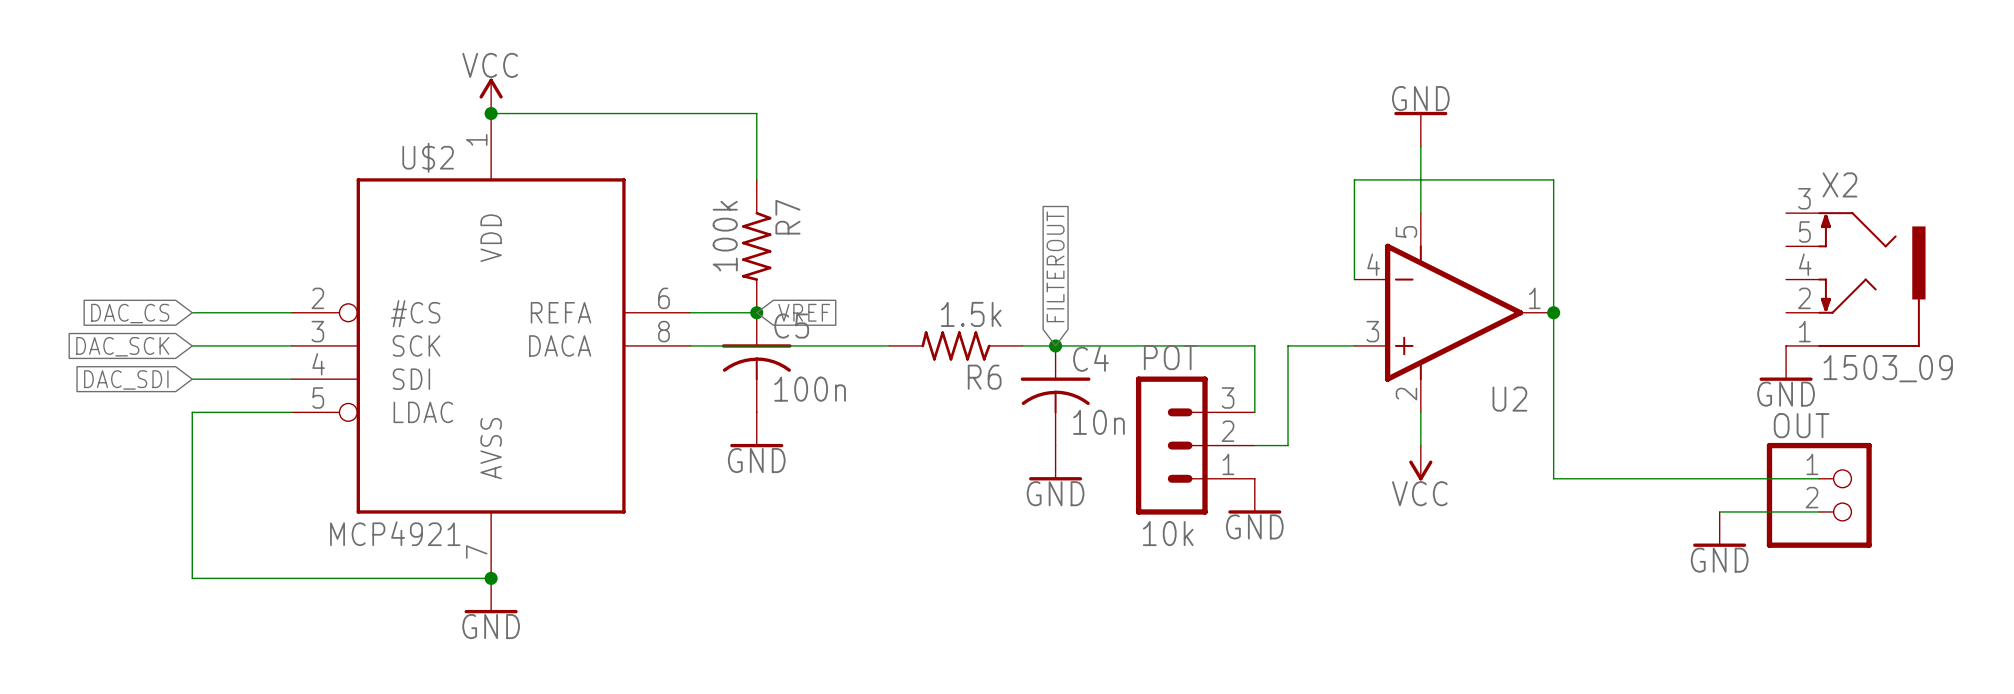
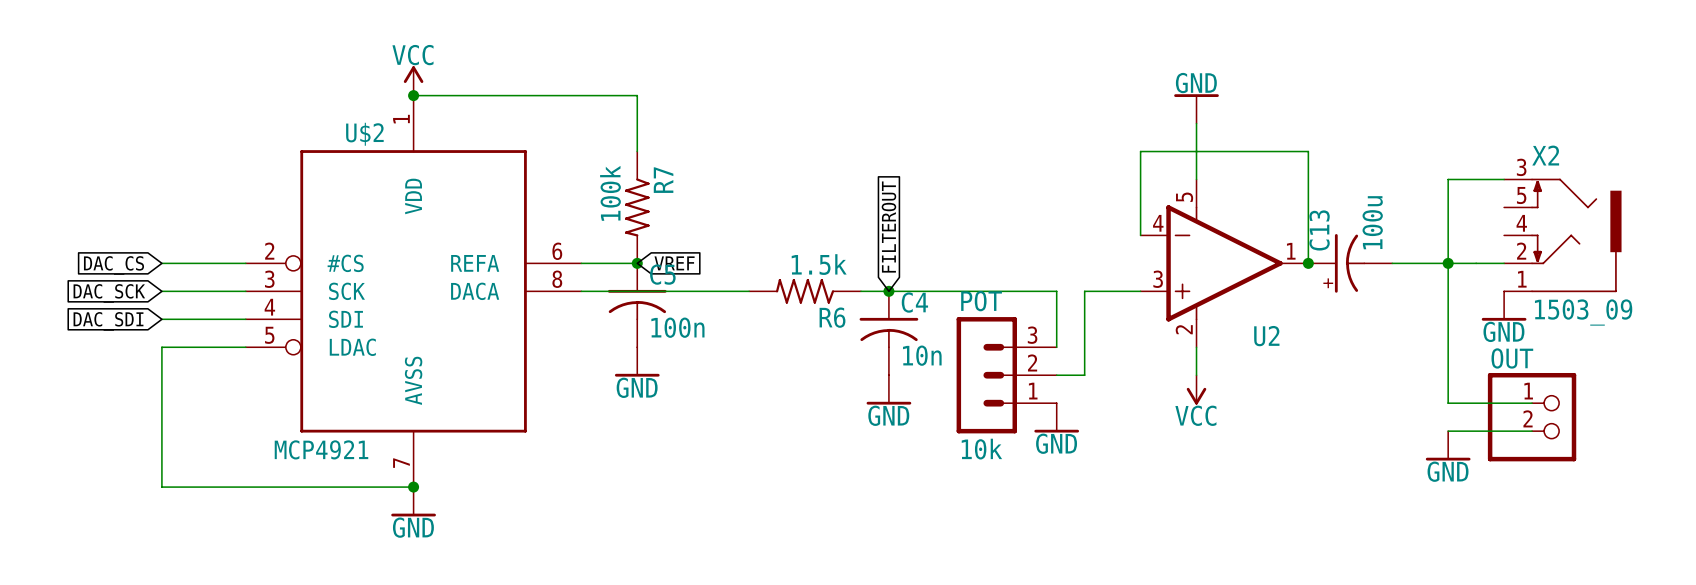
wire: (1553, 312) (1553, 478) (1719, 478) -> (1504, 179) (1448, 179) (1448, 403)
C13: none -> 100u (1350, 263)
wire: none -> (1392, 263) (1504, 263)
junction: none -> (1448, 263)

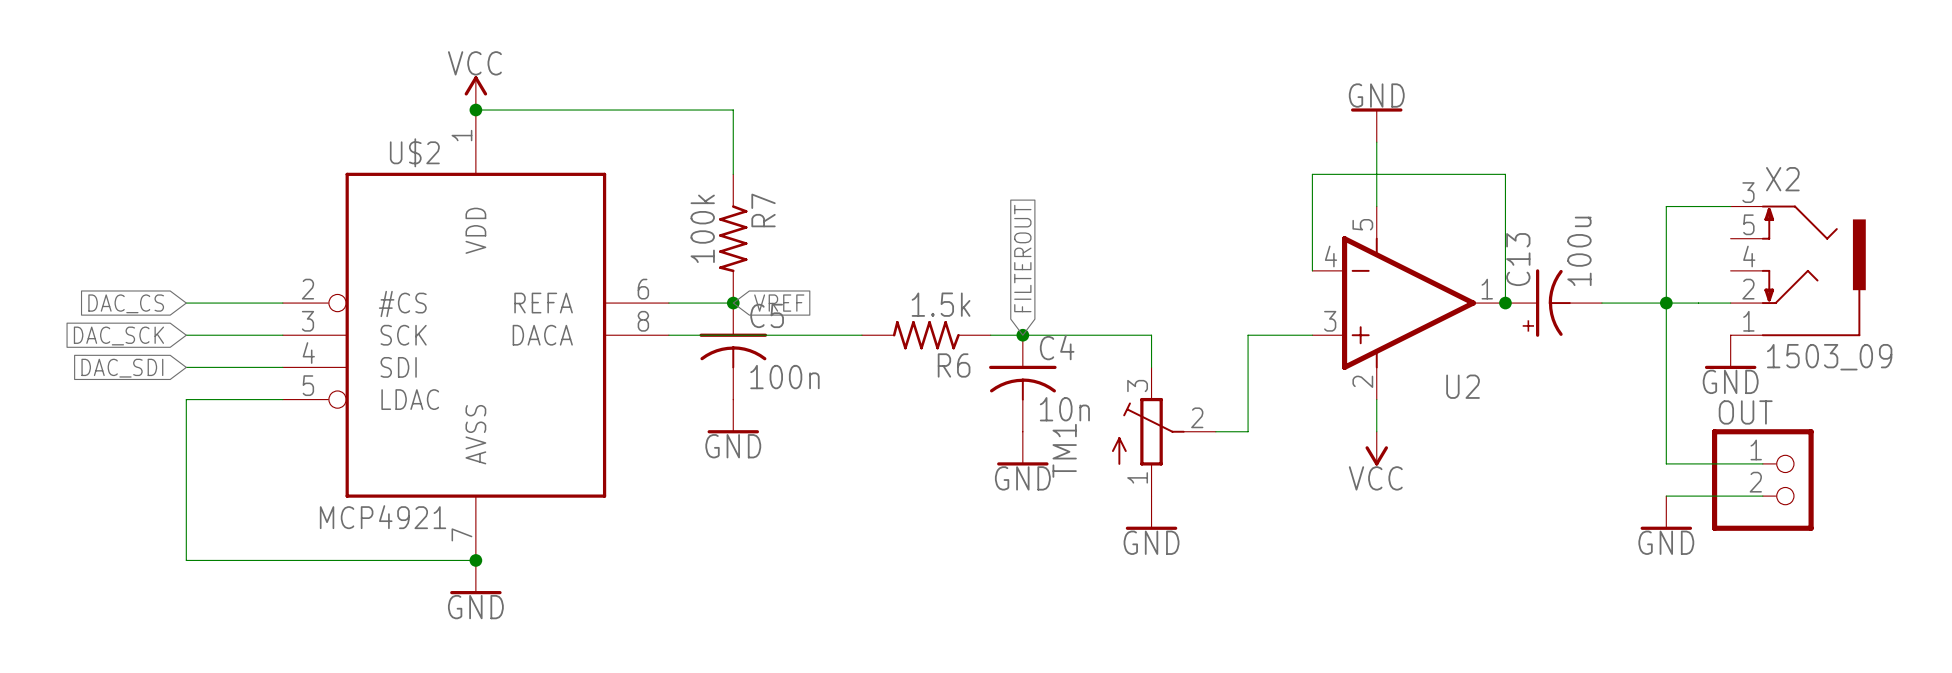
wire: (1000, 291) (1056, 291) (1056, 347) -> (1151, 335) (1151, 367)
POT: 10k (1006, 375) -> none
TM1: none -> (1163, 431)
power symbol position: GND (1056, 417) -> GND (1151, 512)

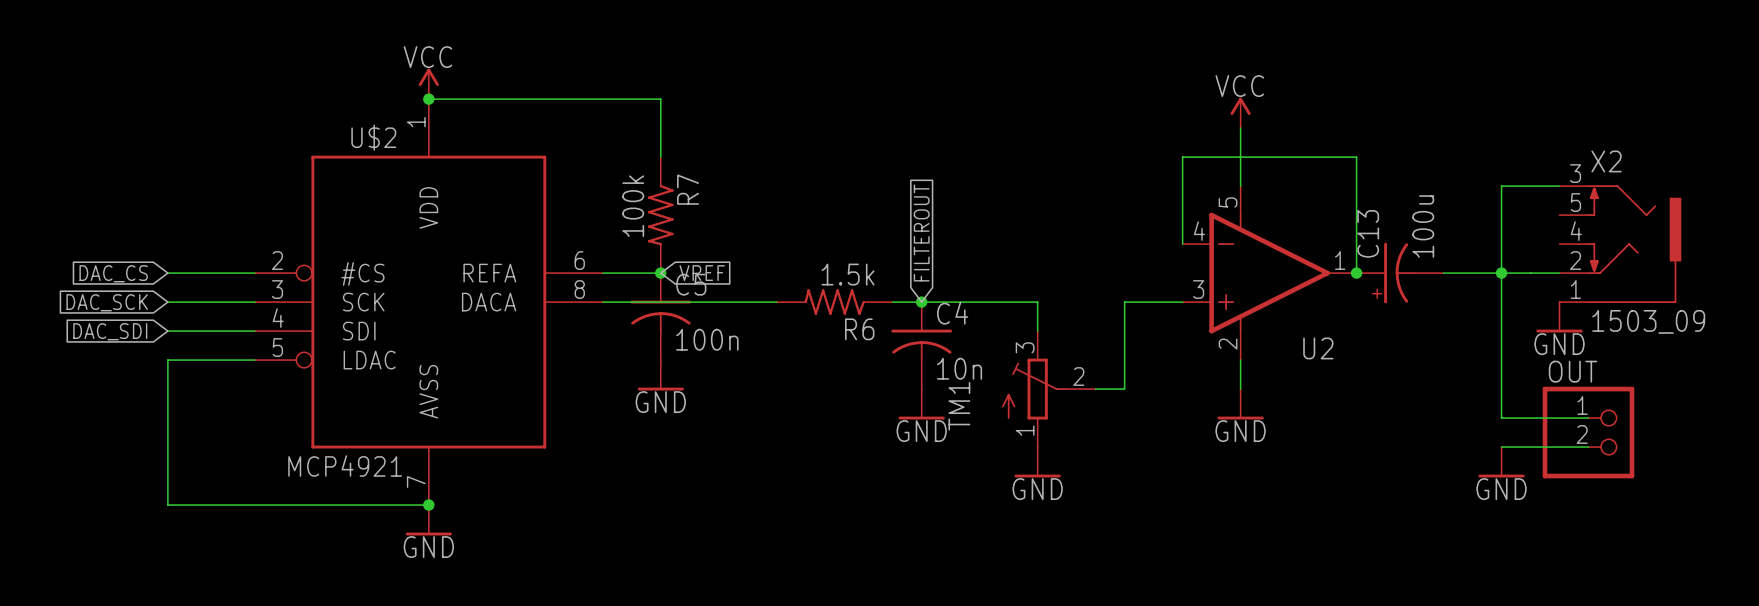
power symbol: GND (1376, 125) -> VCC (1240, 112)
power symbol: VCC (1376, 448) -> GND (1240, 404)

